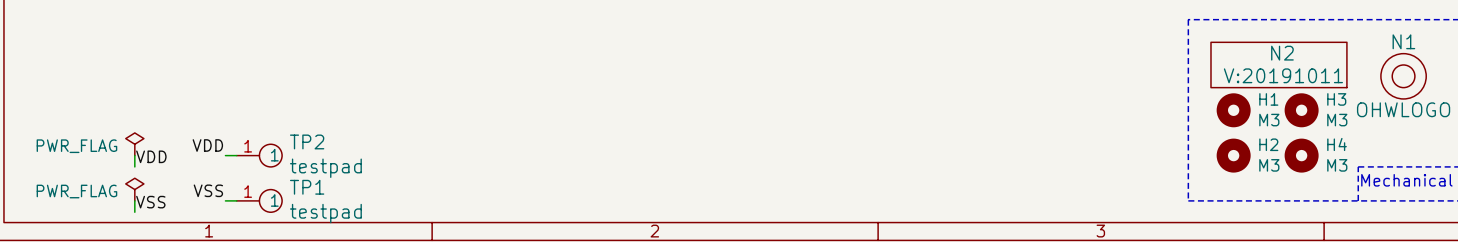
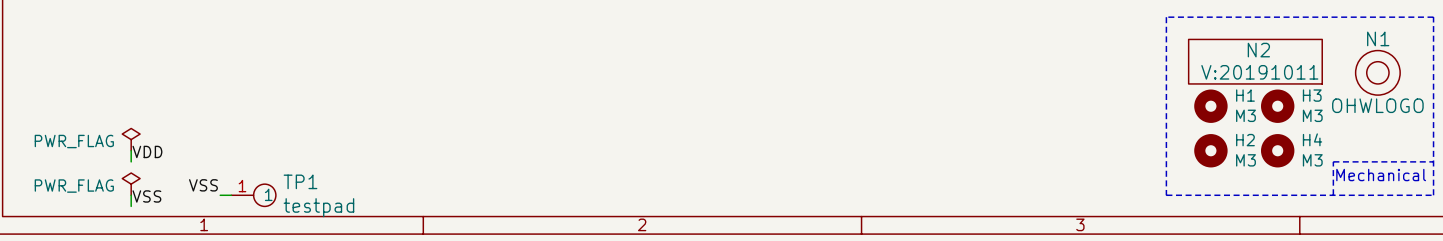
label: VDD (207, 145) -> none
wire: (225, 155) (236, 155) -> none
TP2: testpad (259, 155) -> none

